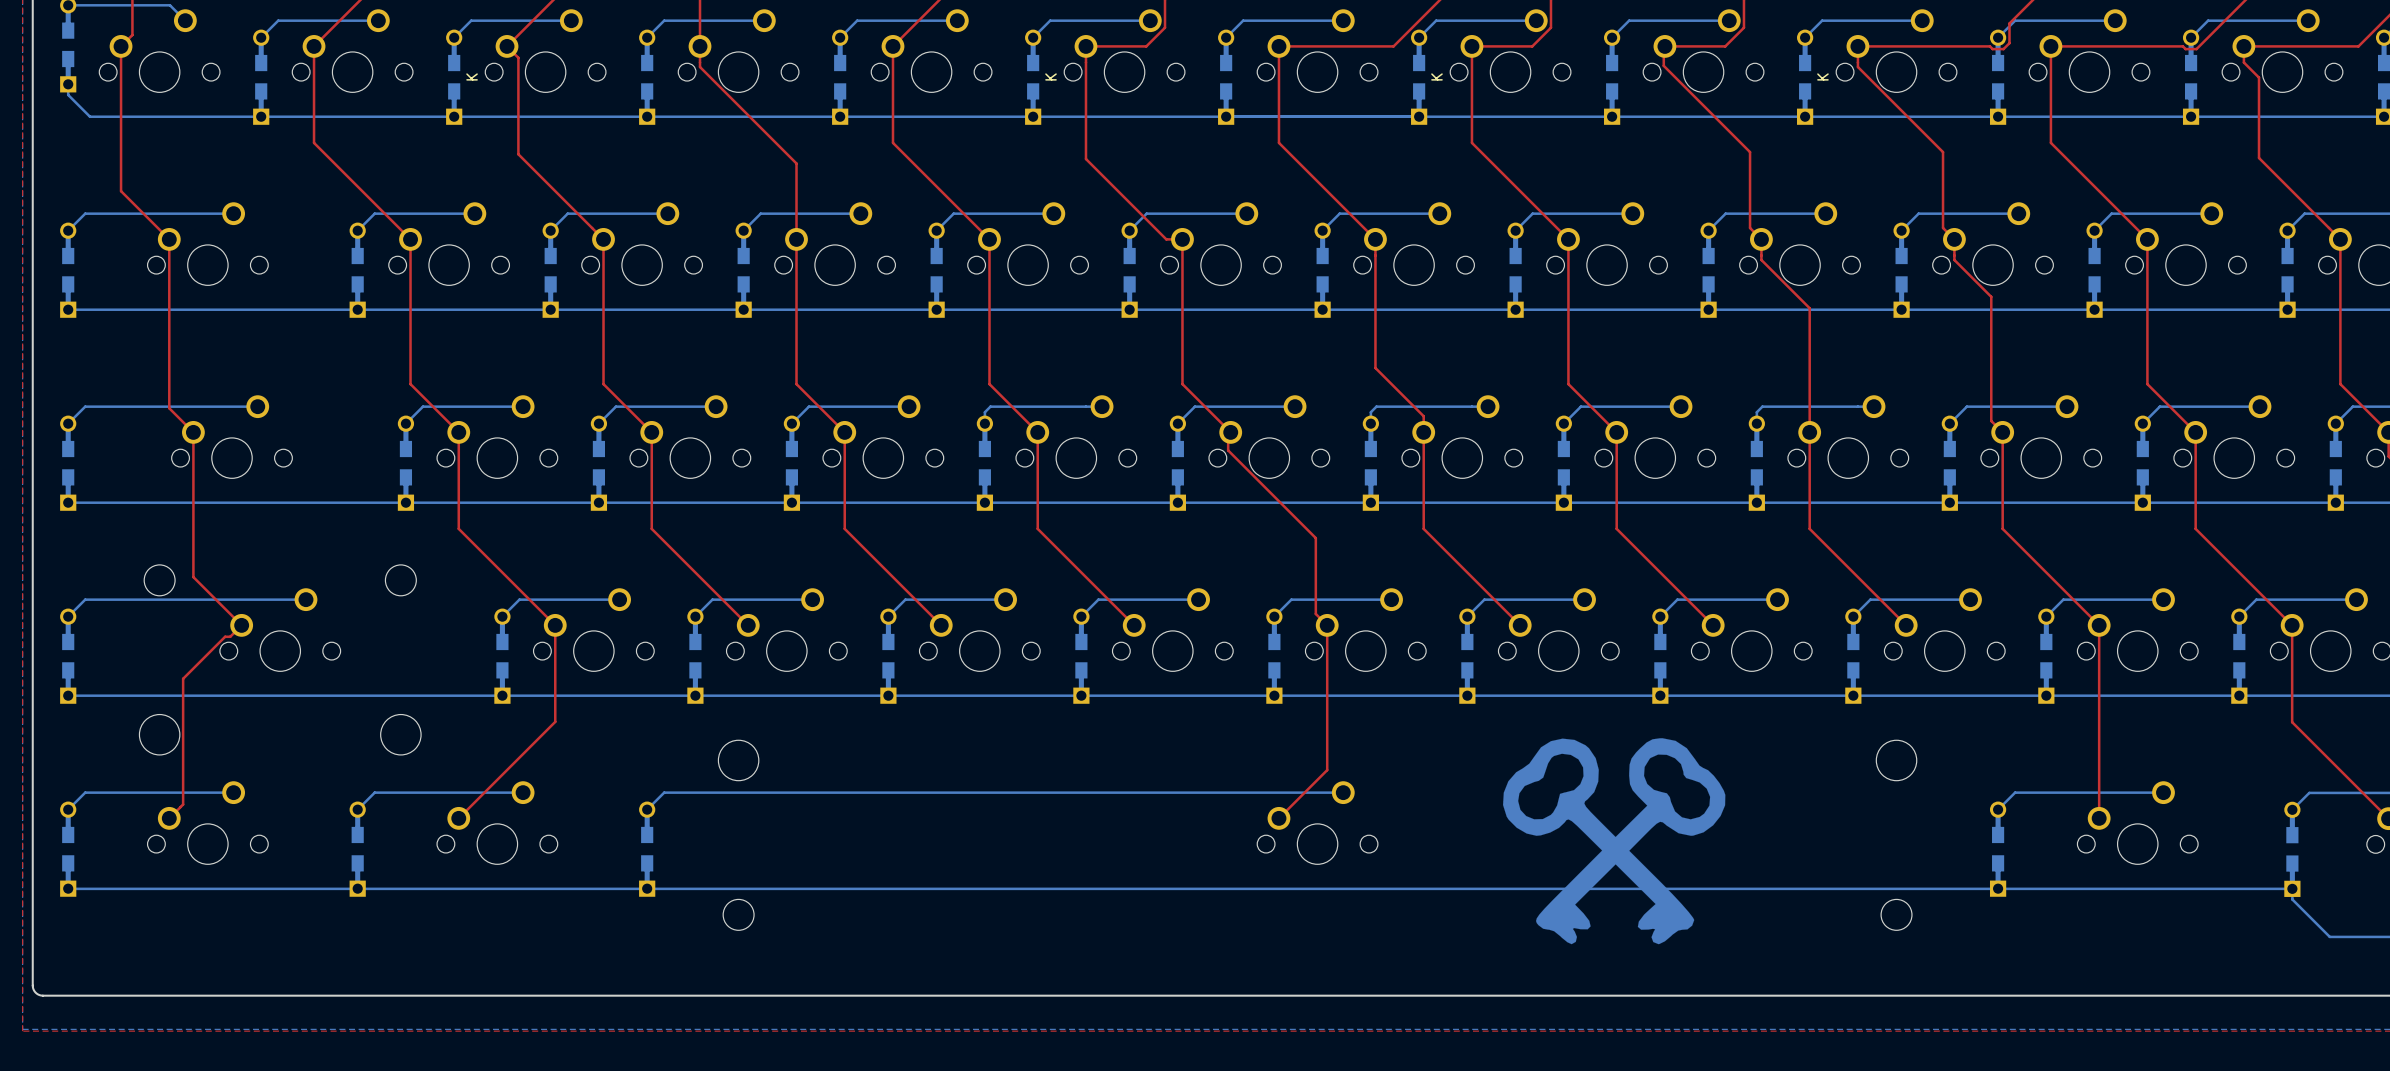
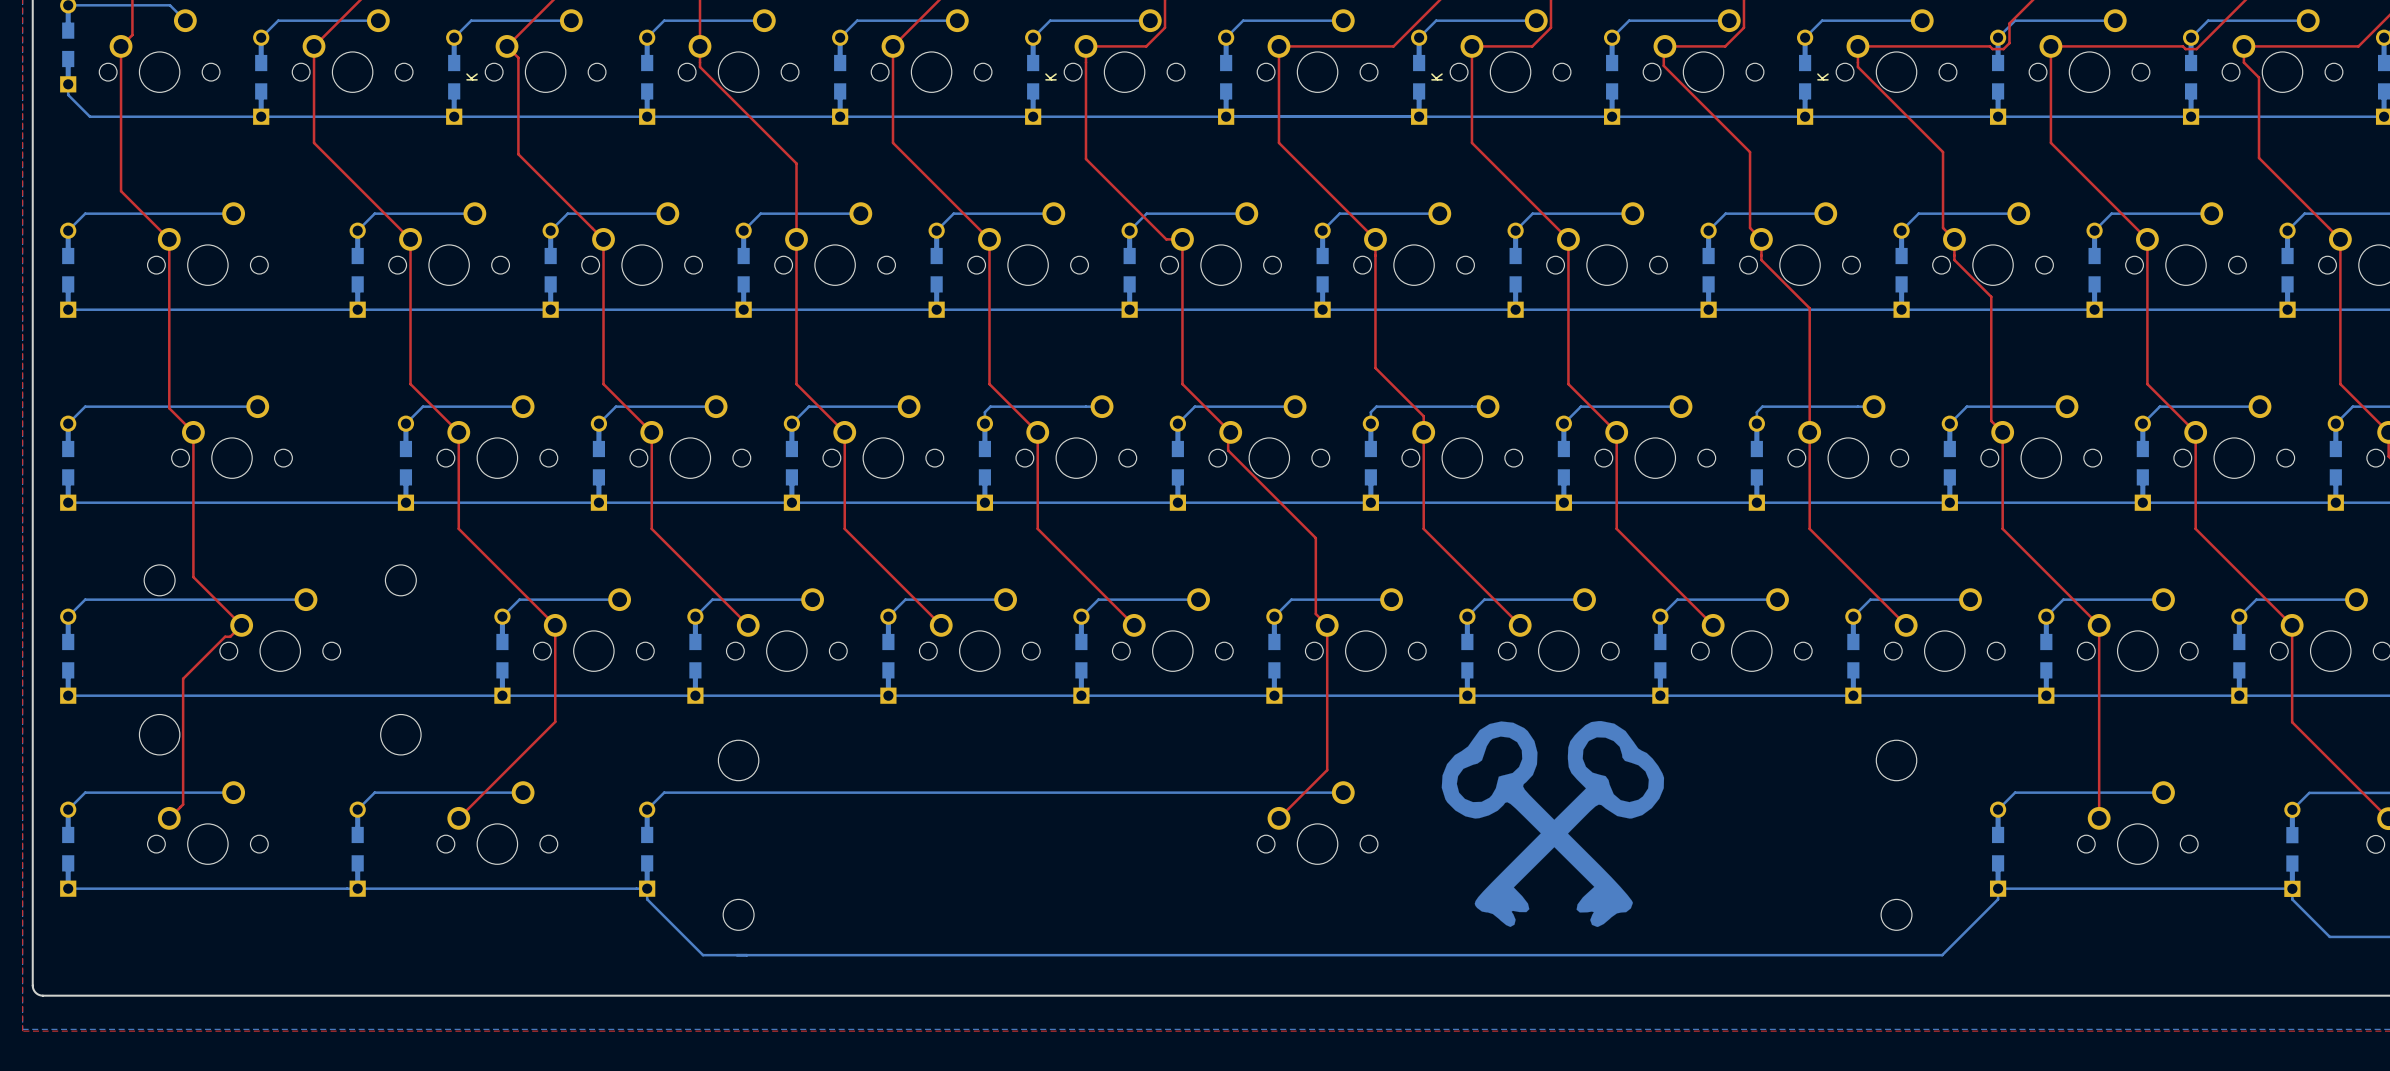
drawing position: (1614, 841) -> (1552, 823)
bottom track: (68, 888) (2292, 888) -> (68, 888) (647, 888) (647, 899) (703, 955) (1942, 955) (1998, 899) (1998, 888) (2292, 888)

